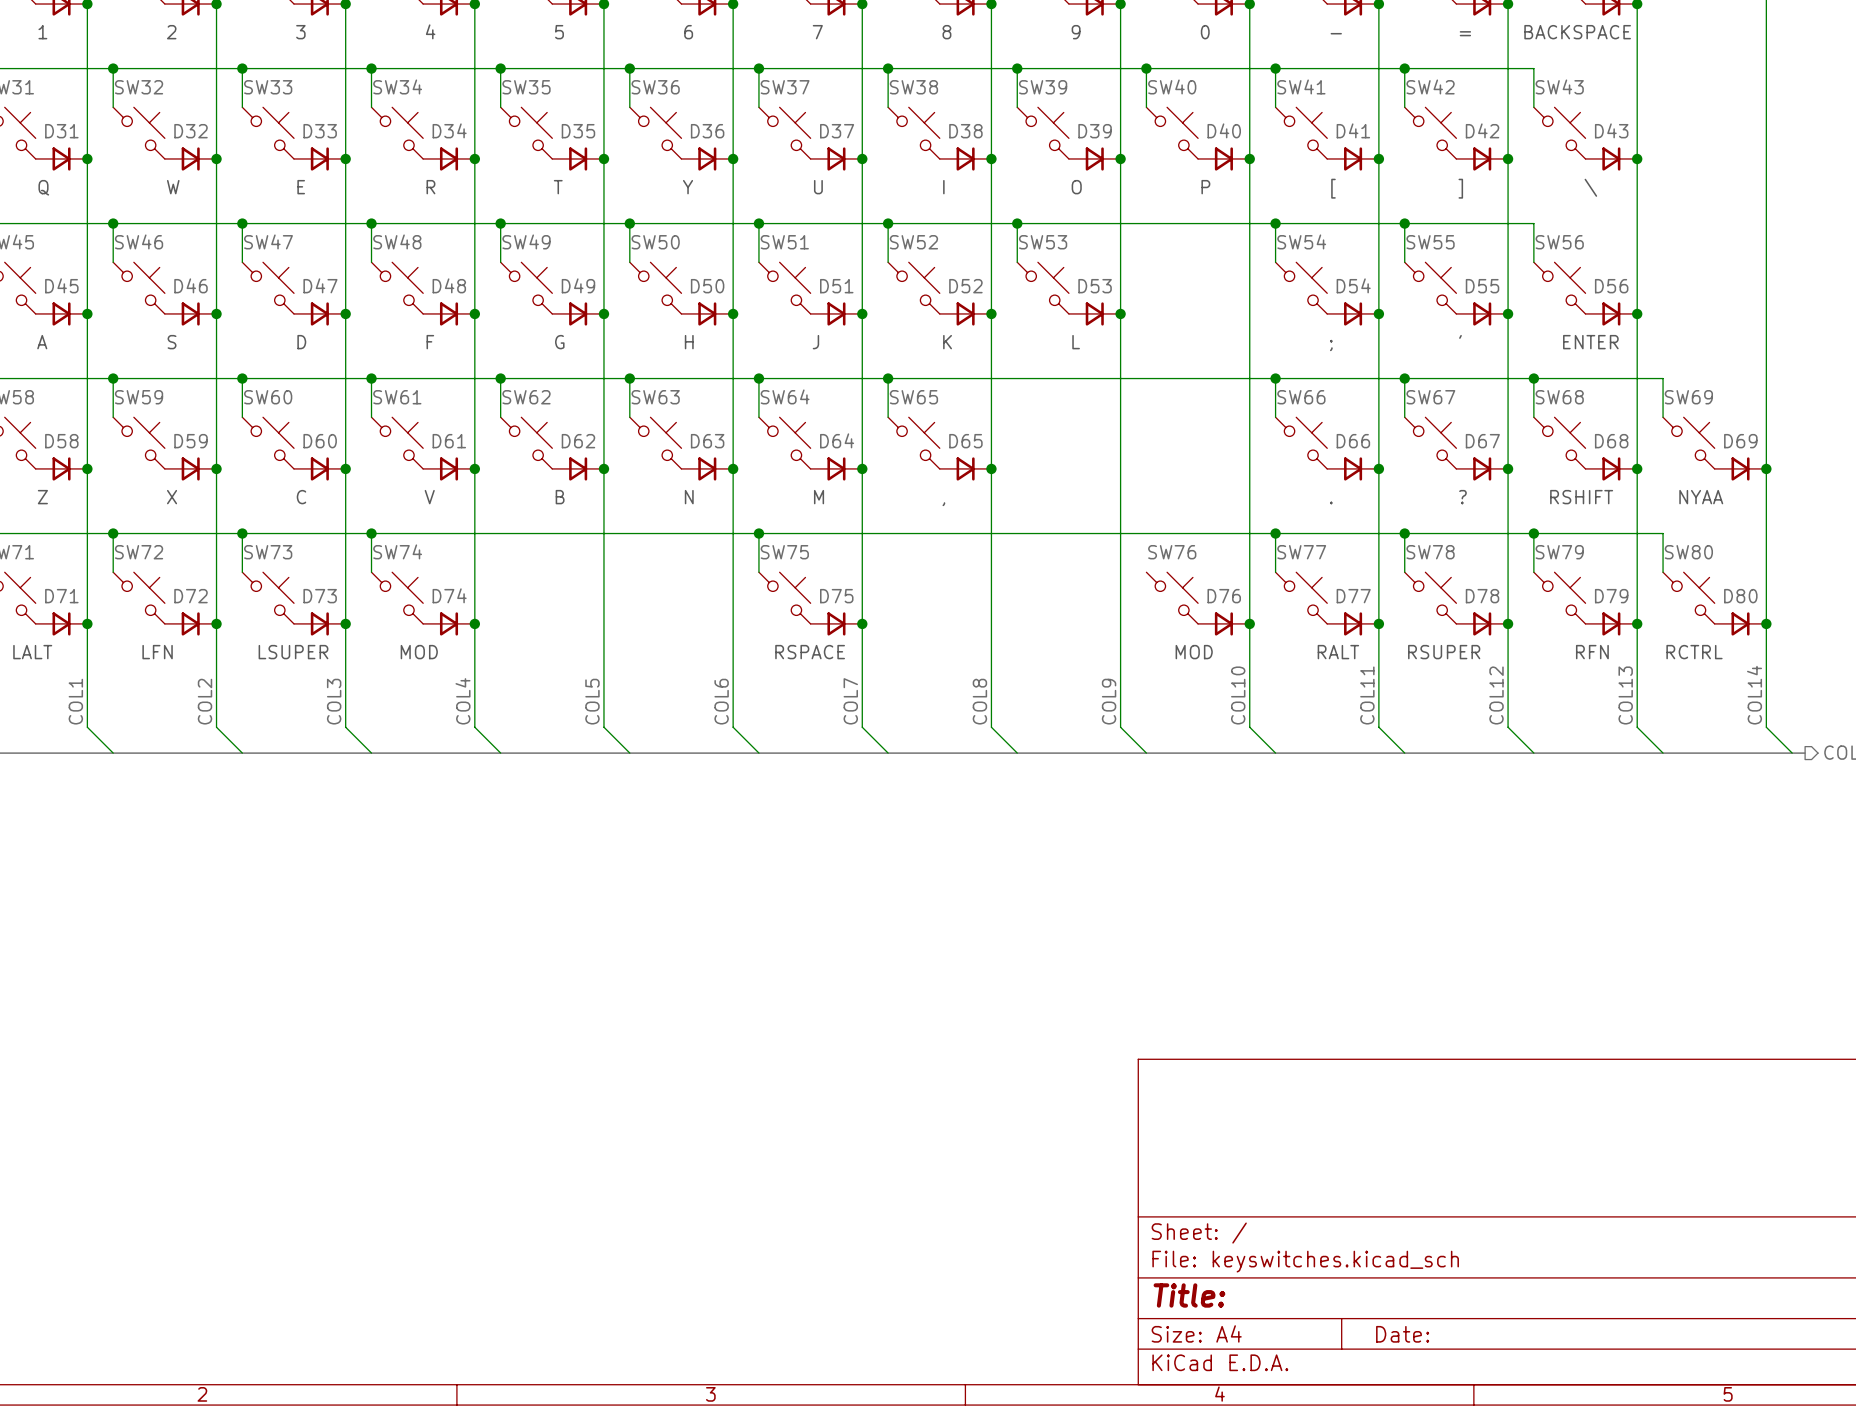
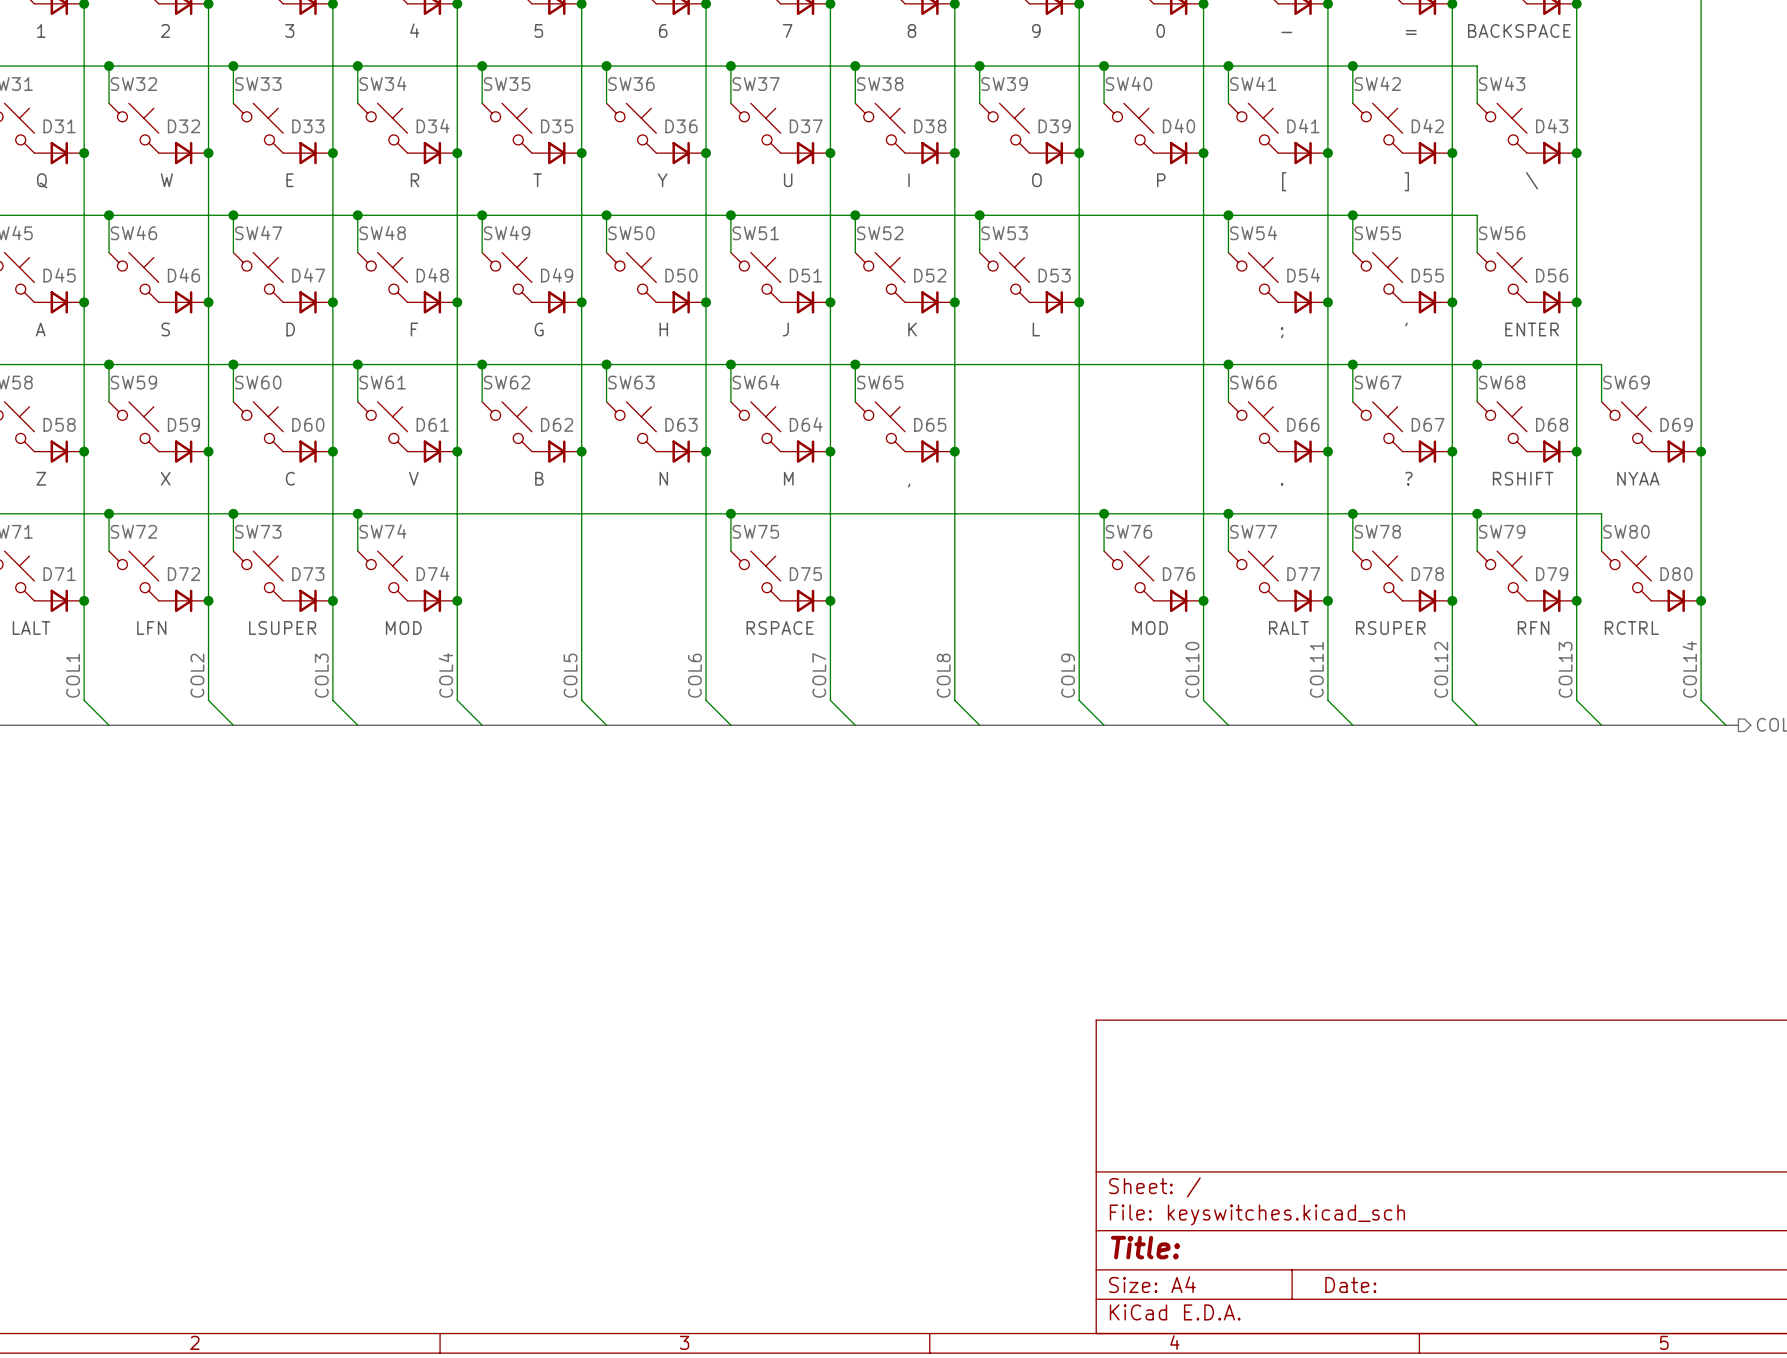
wire: none -> (1104, 513) (1104, 551)
junction: none -> (1104, 513)

